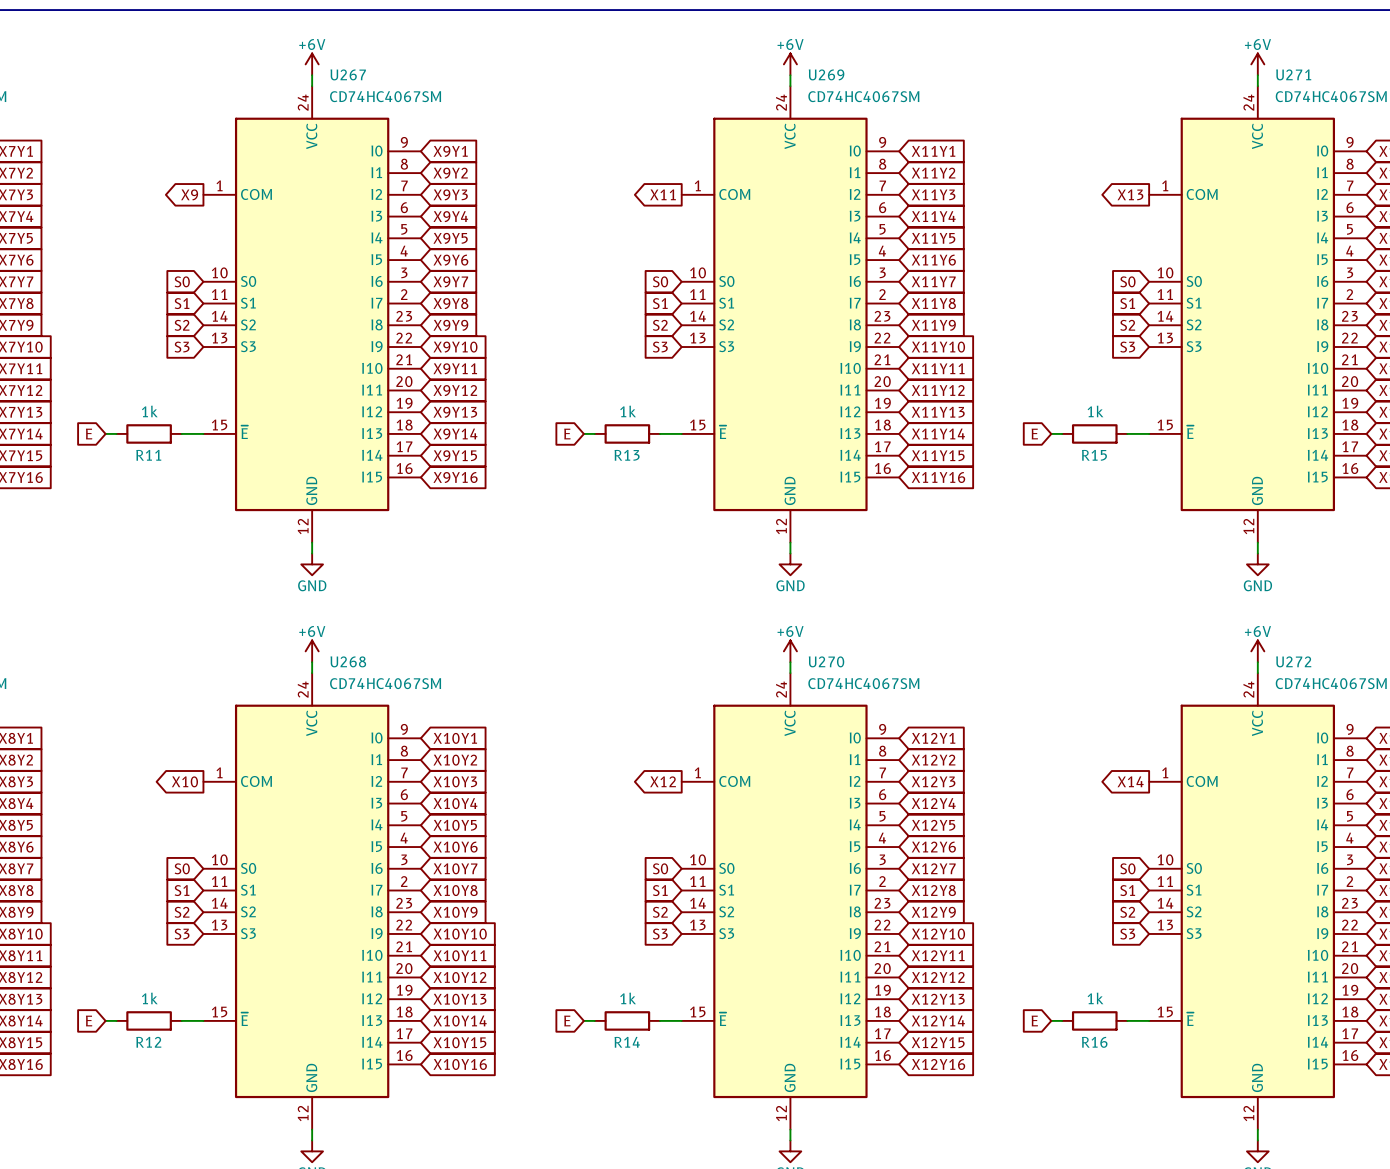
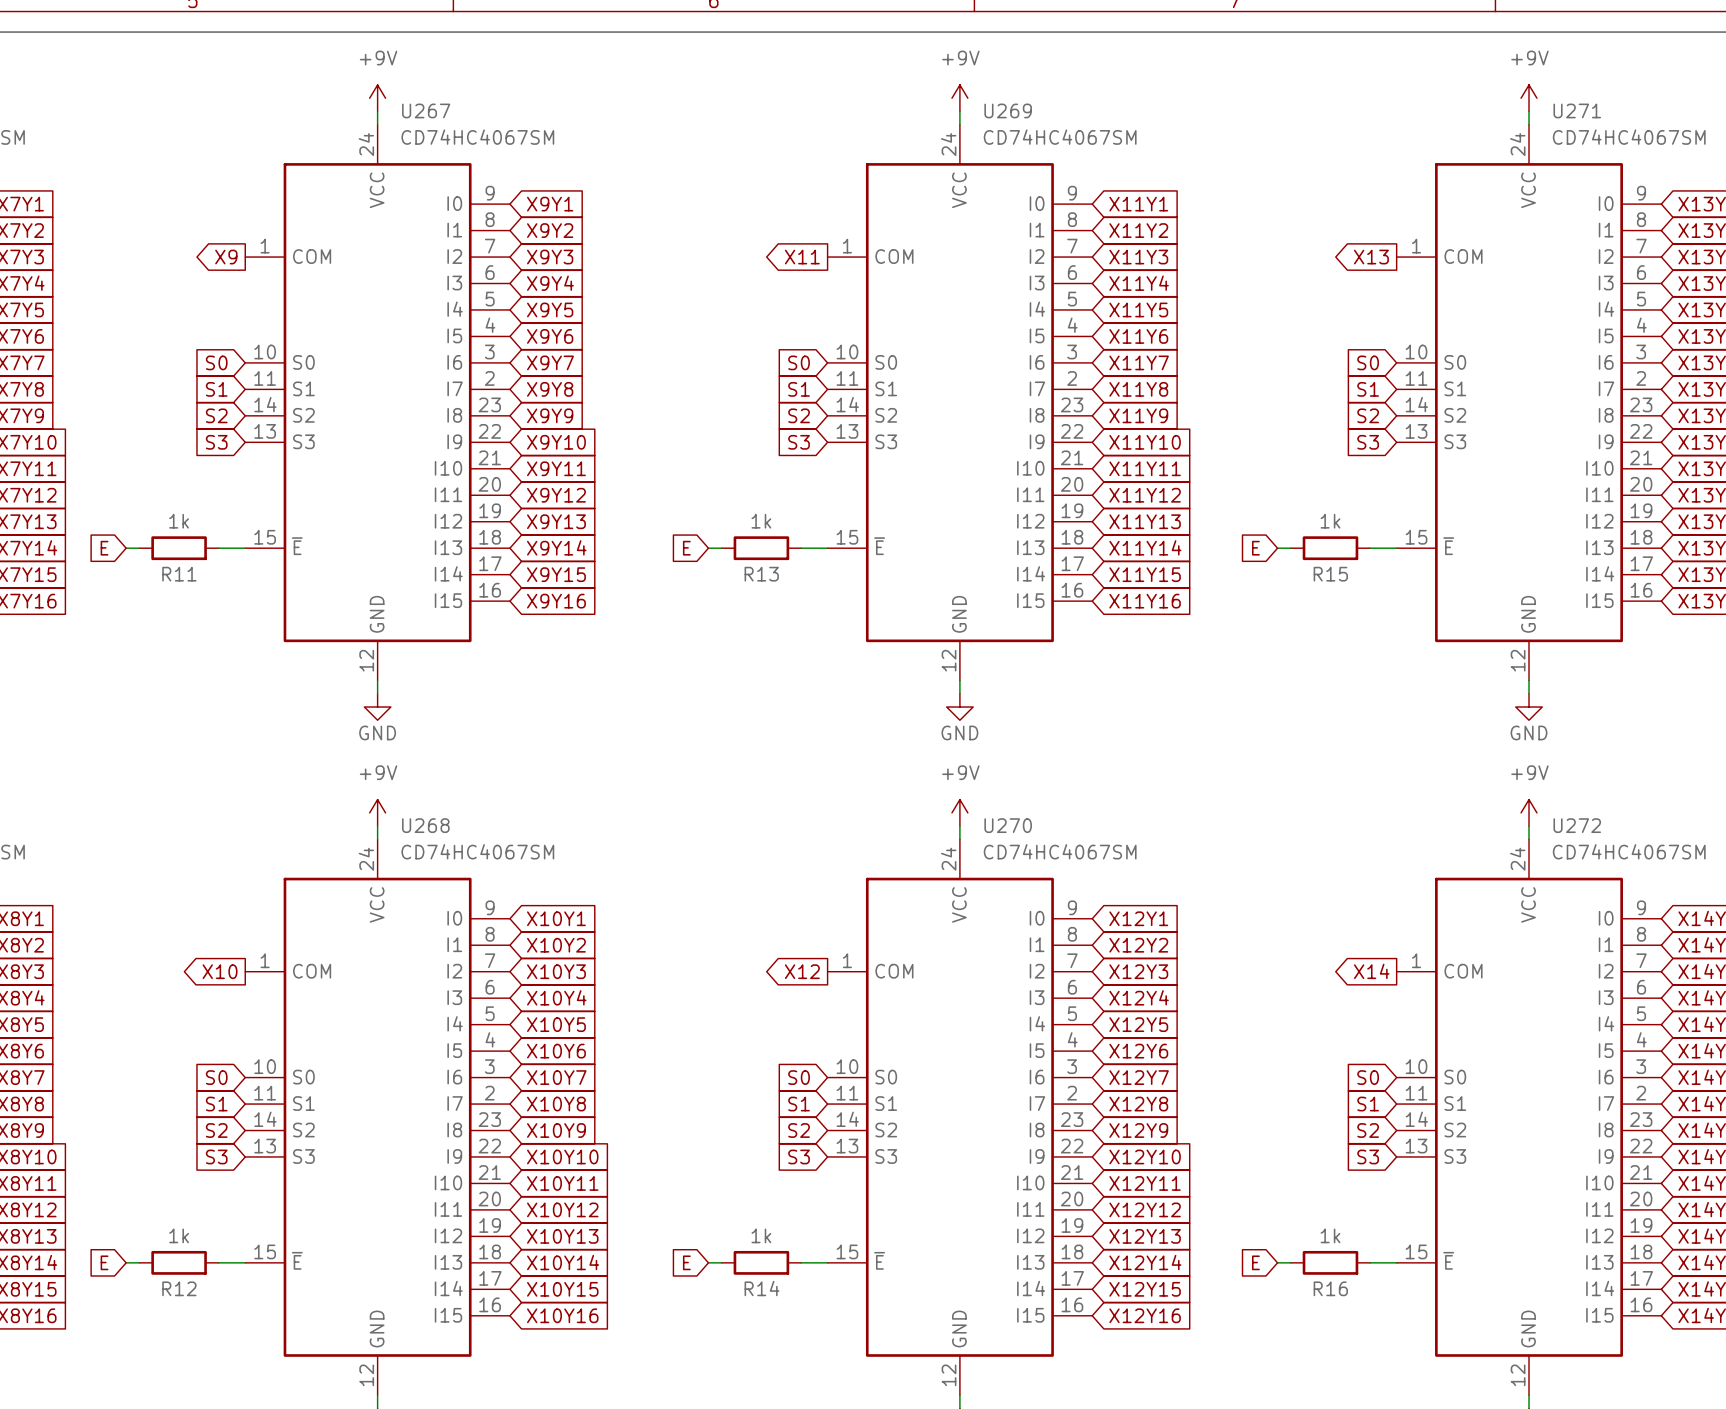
power symbol: +6V (312, 64) -> +9V (377, 98)
power symbol: +6V (790, 64) -> +9V (959, 98)
power symbol: +6V (1257, 64) -> +9V (1529, 98)
power symbol: +6V (312, 651) -> +9V (377, 812)
power symbol: +6V (790, 651) -> +9V (959, 812)
power symbol: +6V (1257, 651) -> +9V (1529, 812)

